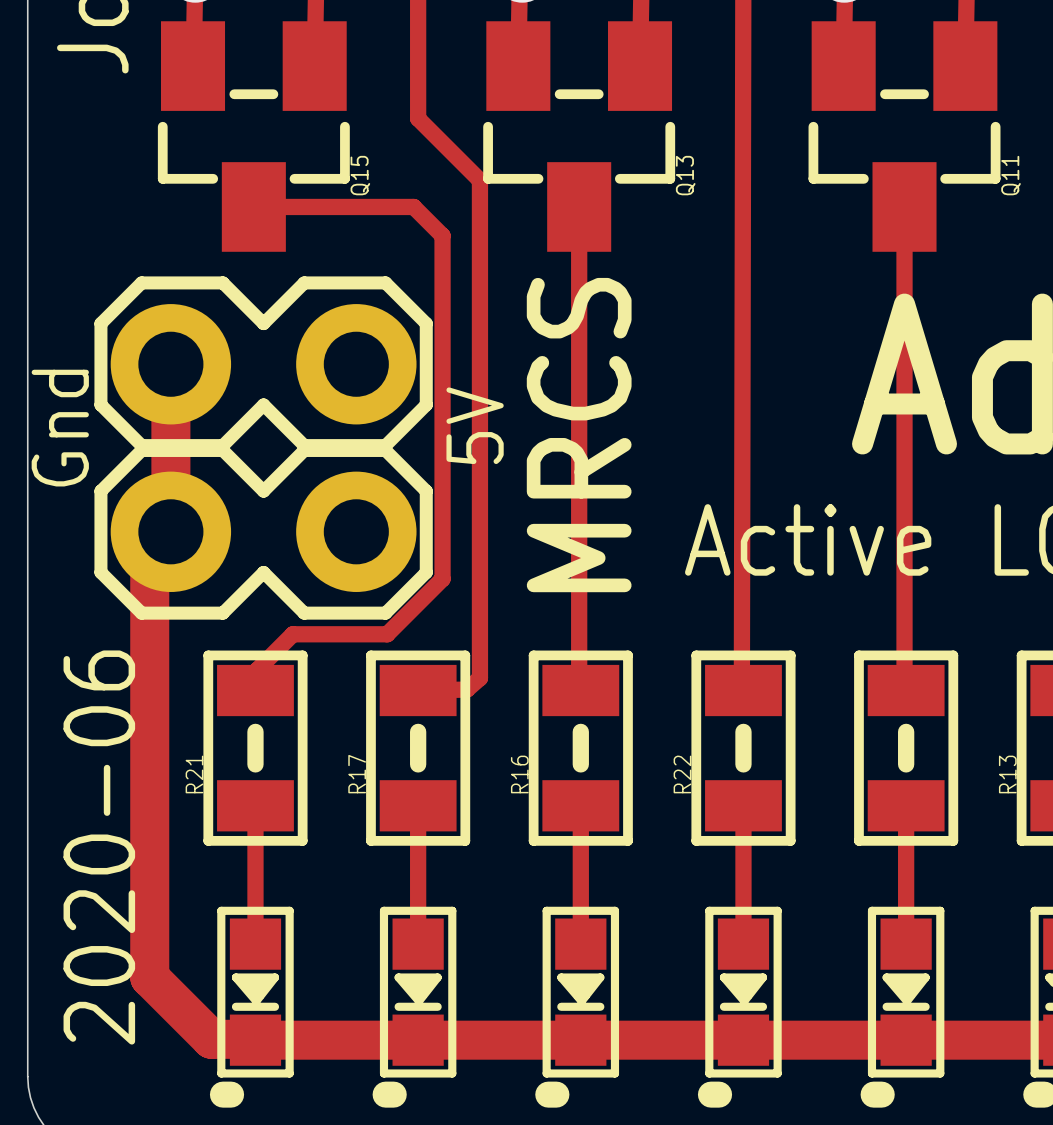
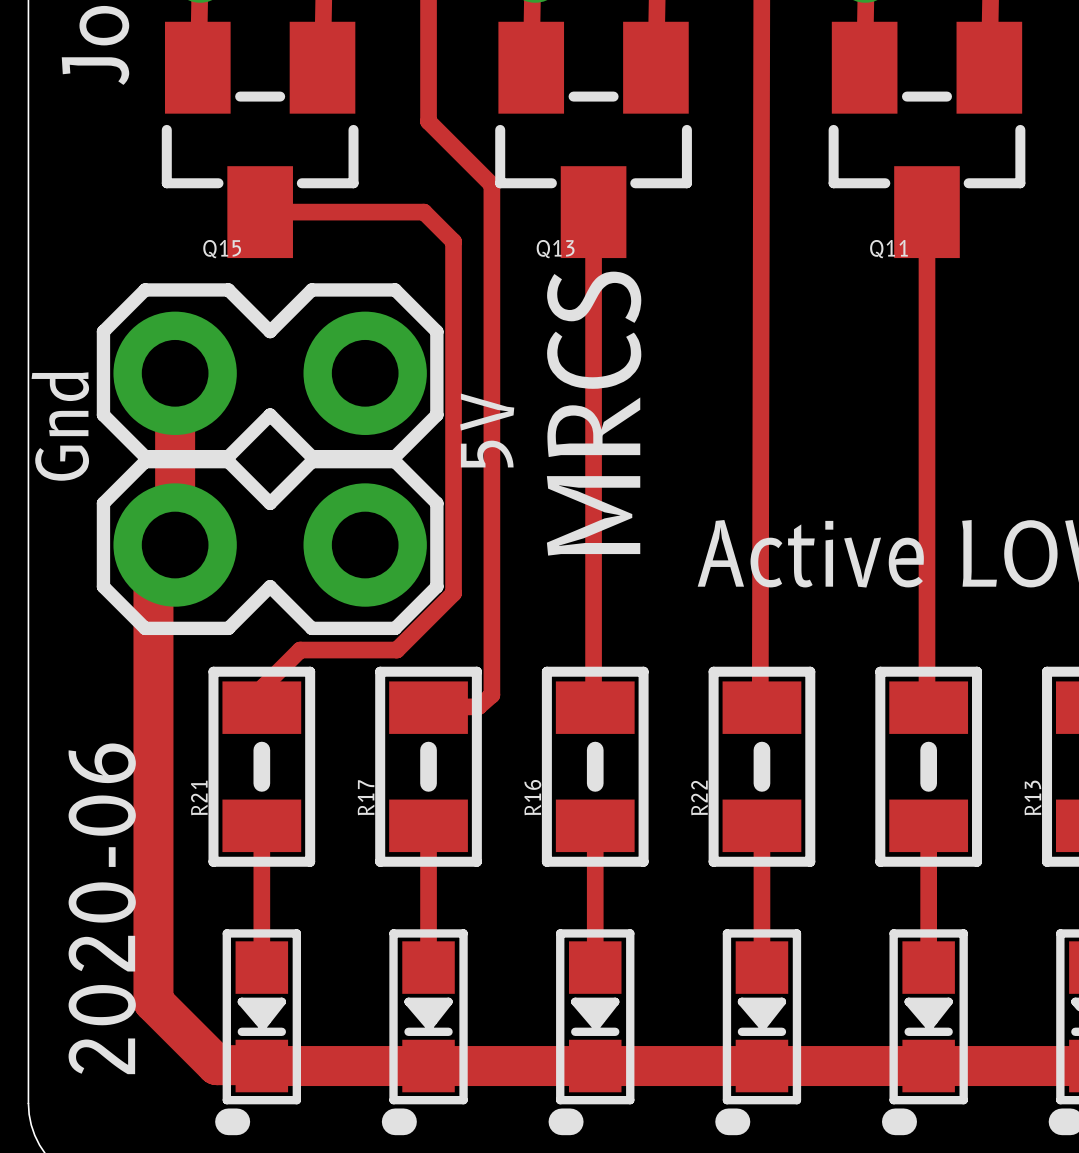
Q15 name rotation: 0° (360, 175) -> 90° clockwise (222, 249)
Q15 name position: Q15 (360, 175) -> Q15 (222, 249)
Q13 name rotation: 0° (685, 175) -> 90° clockwise (555, 249)
Q13 name position: Q13 (685, 175) -> Q13 (555, 249)
Q11 name rotation: 0° (1011, 175) -> 90° clockwise (888, 249)
Q11 name position: Q11 (1011, 175) -> Q11 (888, 249)

